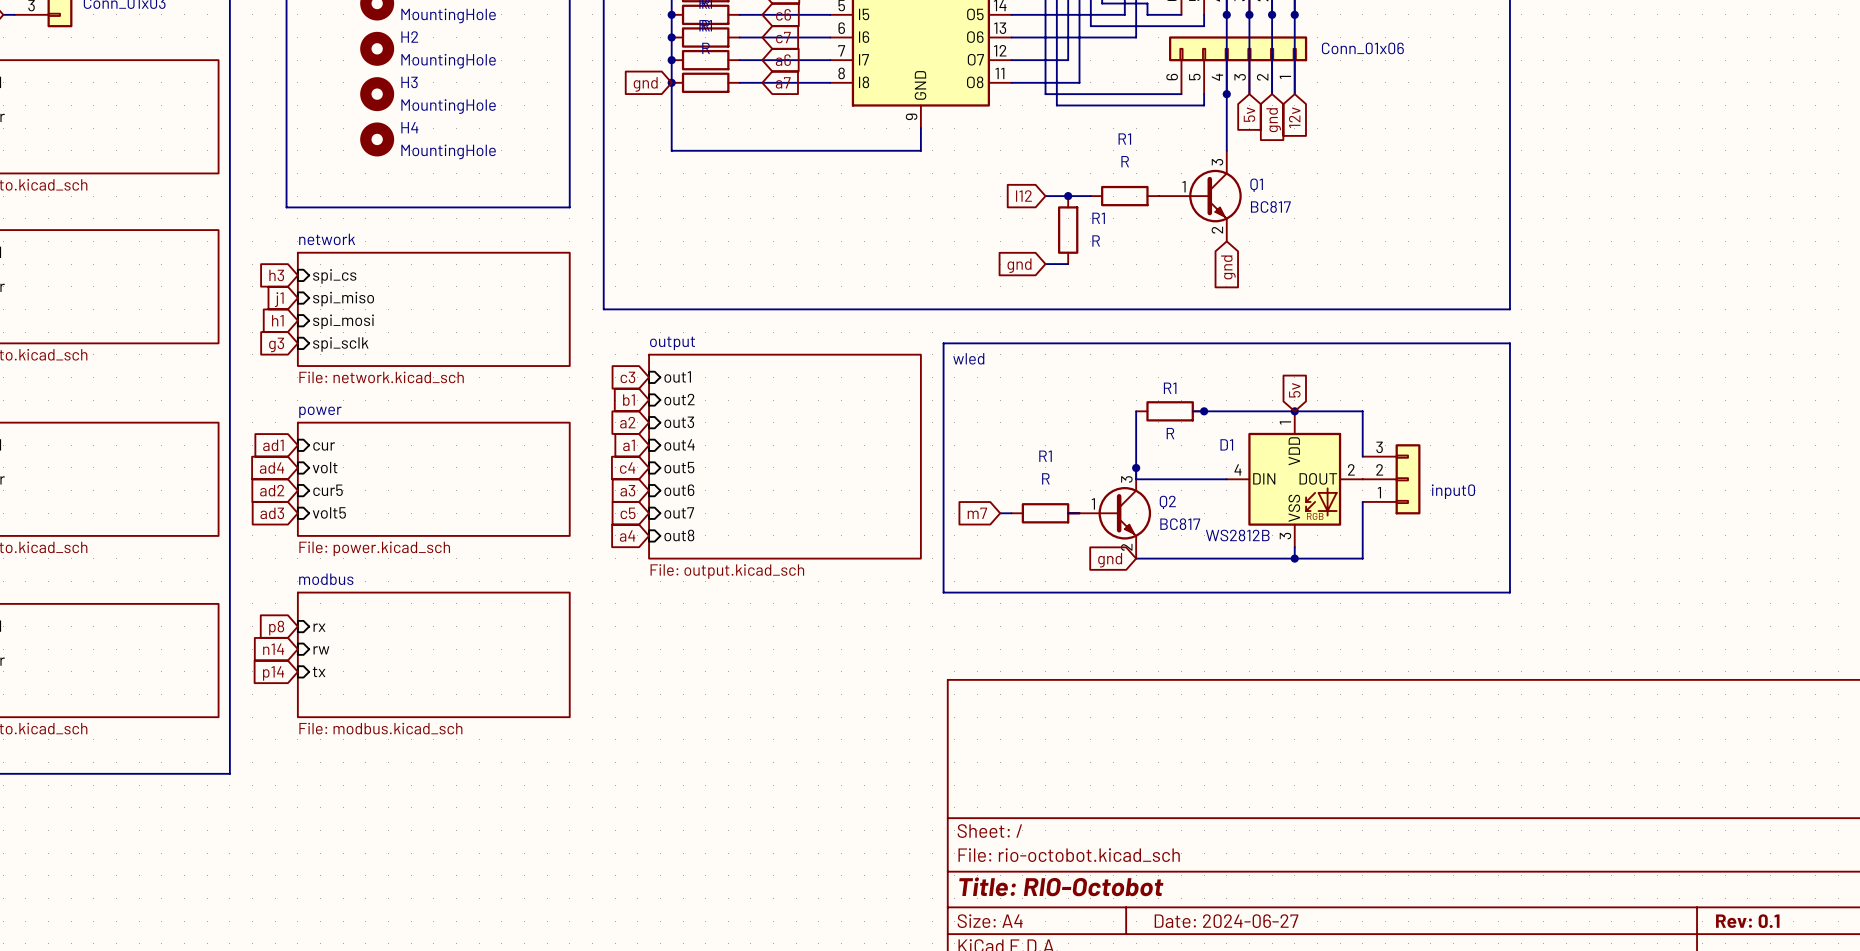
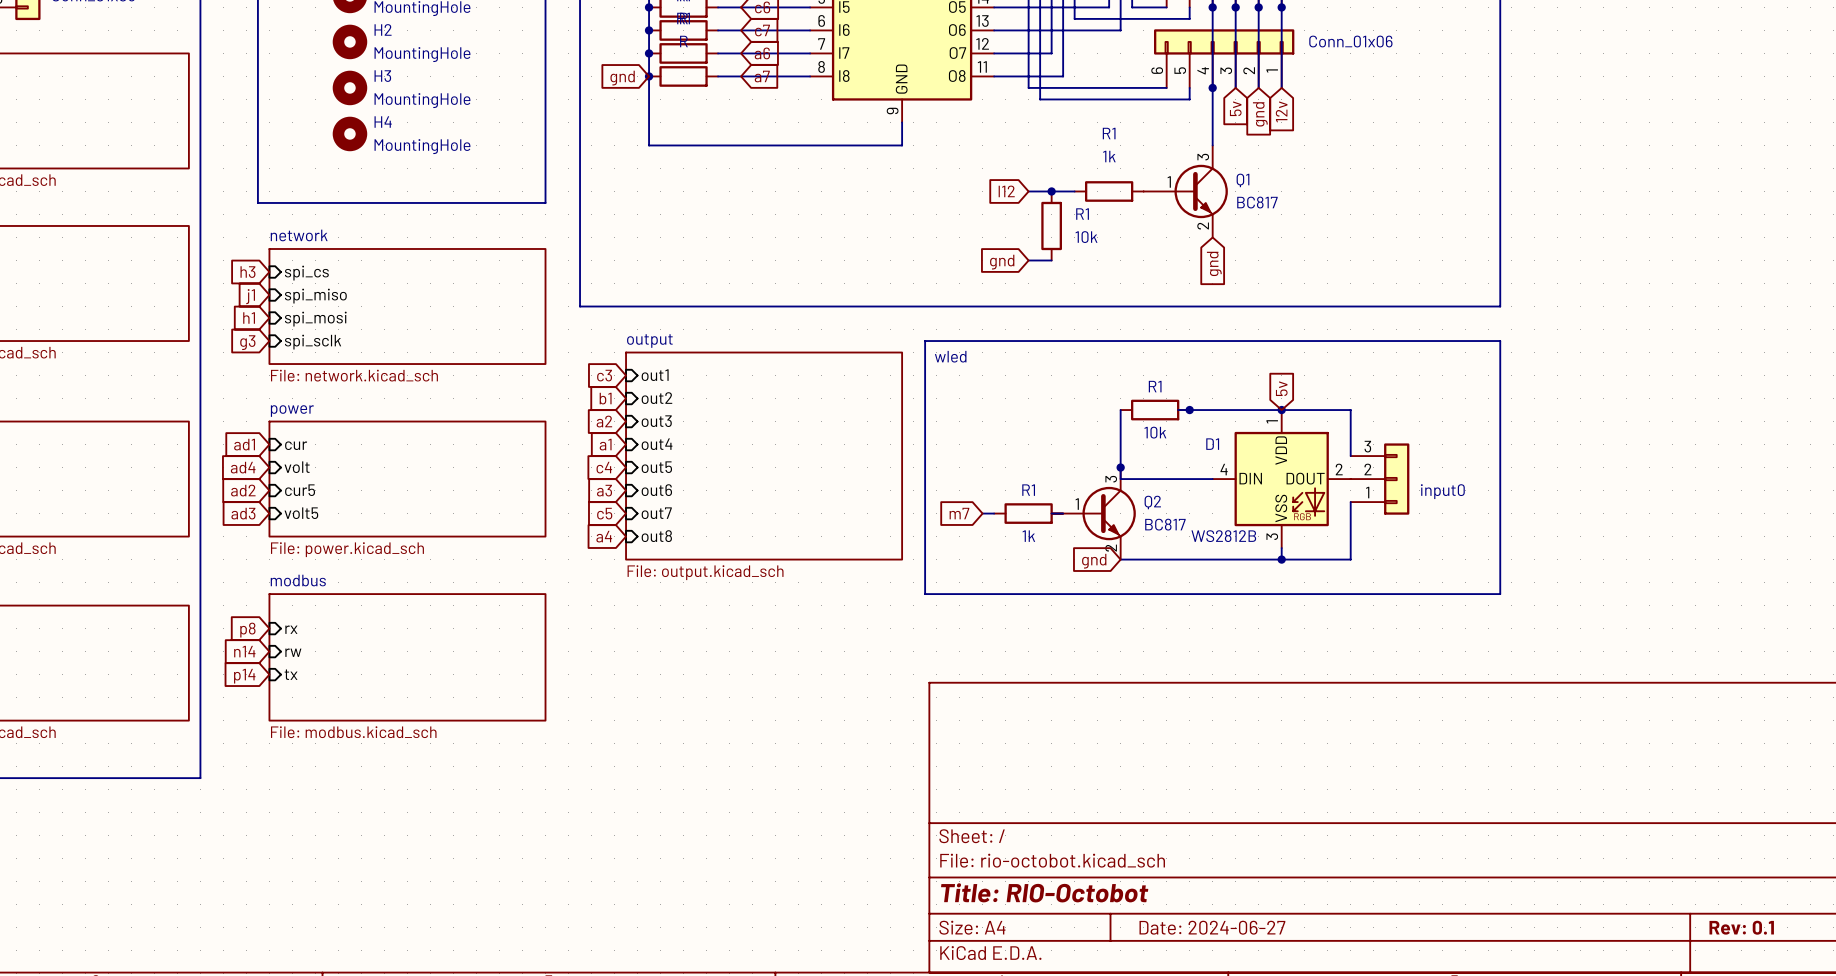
R1 value: R (1125, 161) -> 1k (1109, 156)
R1 value: R (1096, 240) -> 10k (1086, 237)
R1 value: R (1170, 433) -> 10k (1155, 432)
R1 name position: R1 (1045, 456) -> R1 (1028, 490)
R1 value: R (1045, 478) -> 1k (1028, 536)

